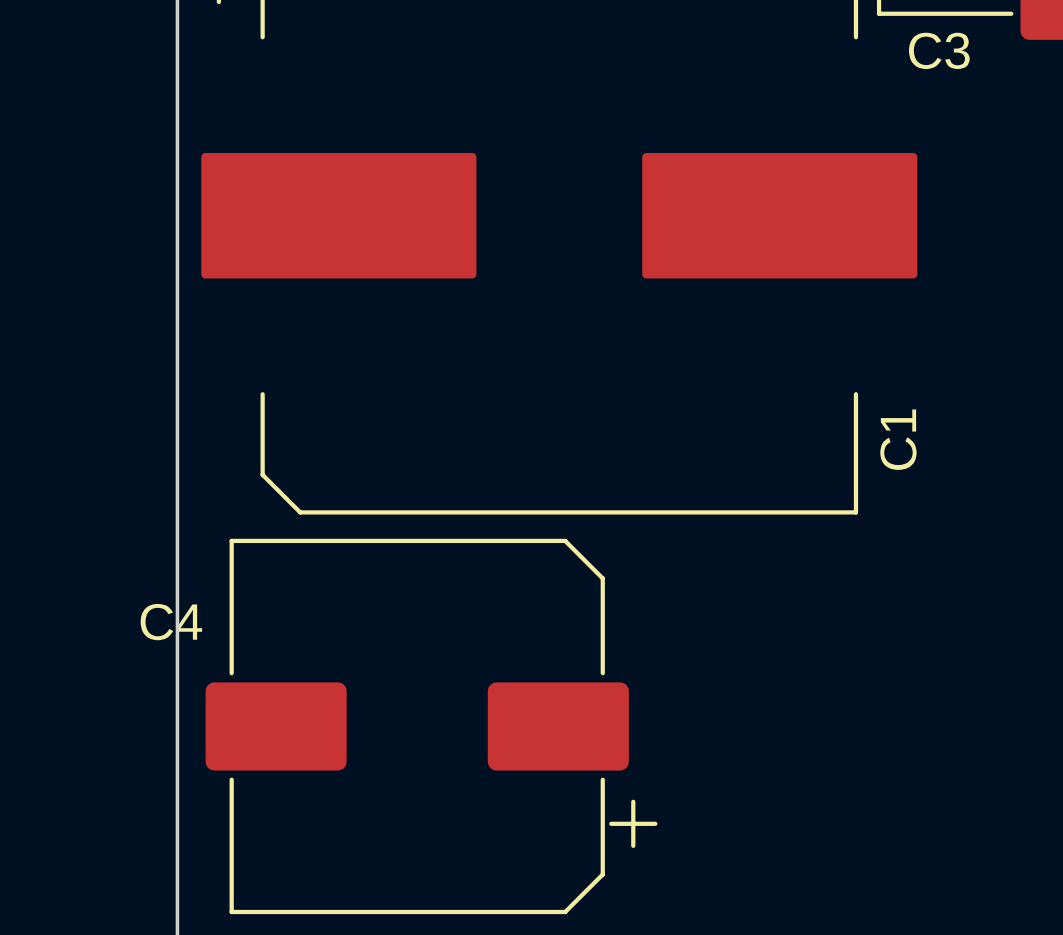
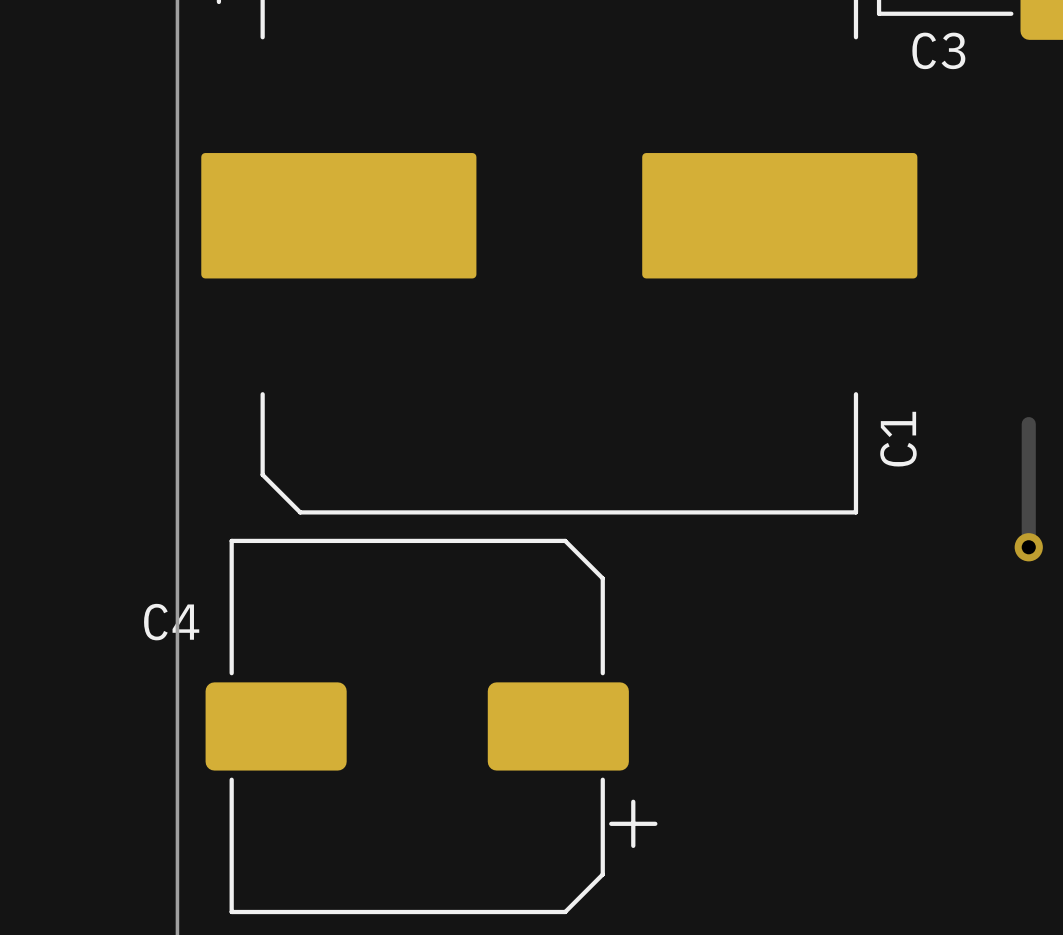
track: none -> (1028, 424) (1028, 547)
via: none -> (1028, 547)

